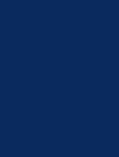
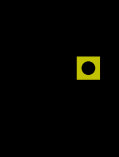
part: none -> (88, 68)

